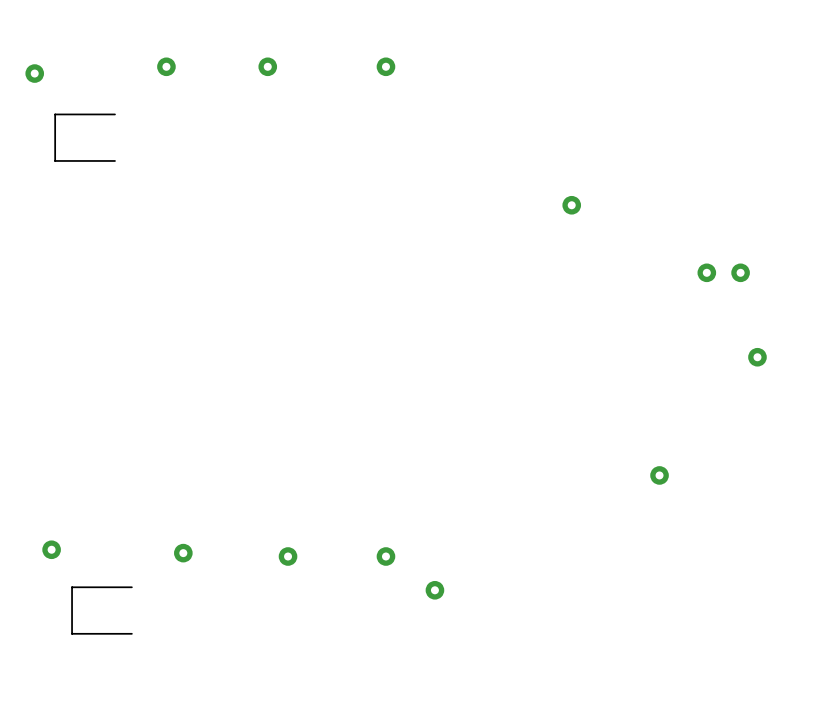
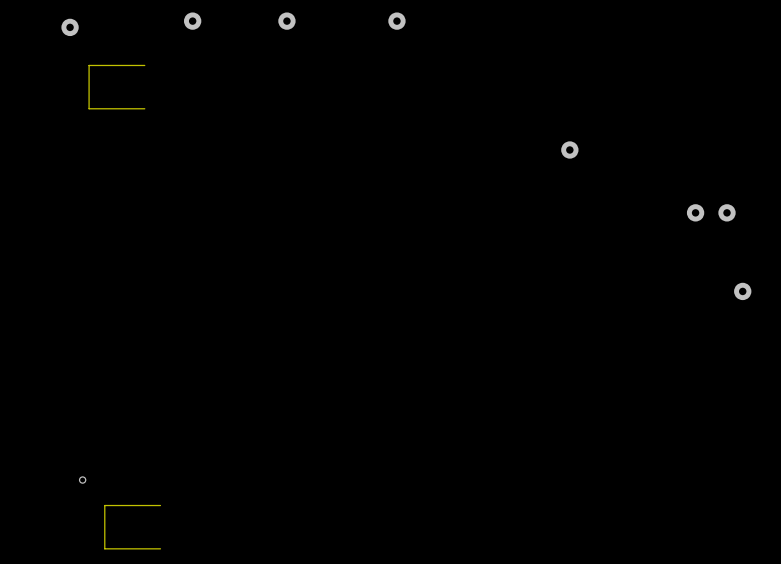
via: (659, 475) -> none
via size: [42, 540, 61, 560] -> [78, 476, 87, 484]
via: (183, 553) -> none
via: (288, 556) -> none
via: (385, 556) -> none
via: (434, 590) -> none

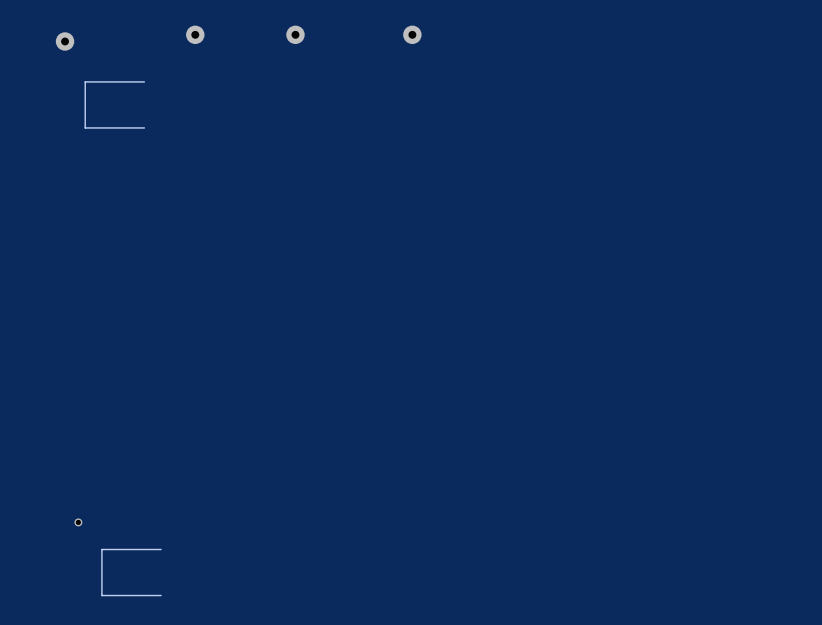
via: (569, 149) -> none
via: (695, 212) -> none
via: (727, 212) -> none
via: (742, 291) -> none

